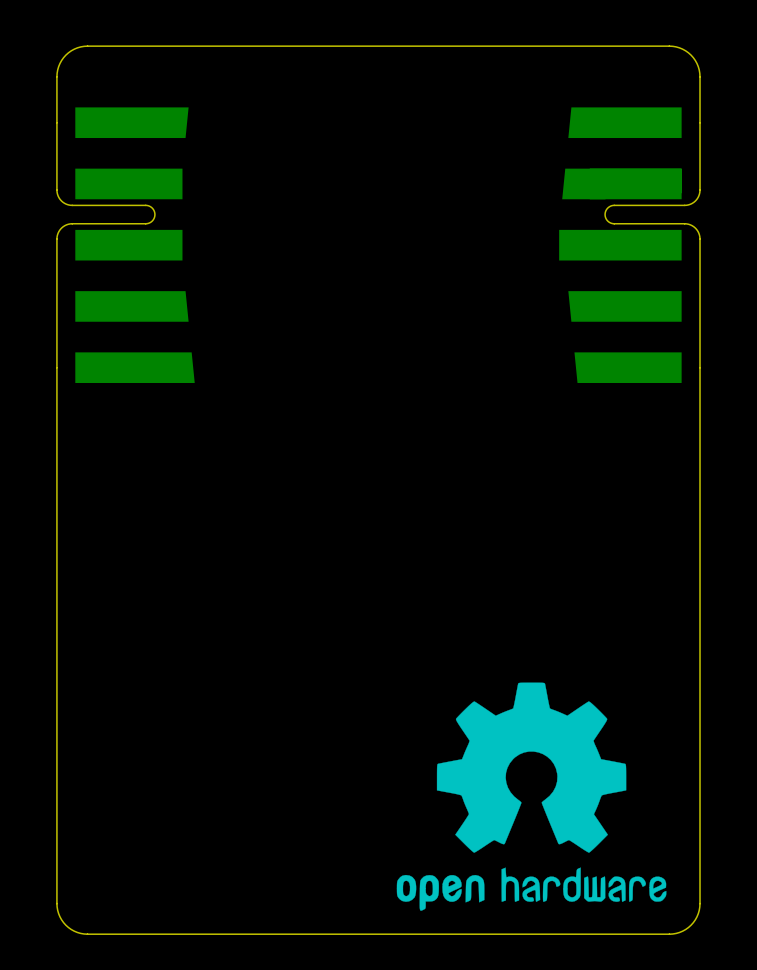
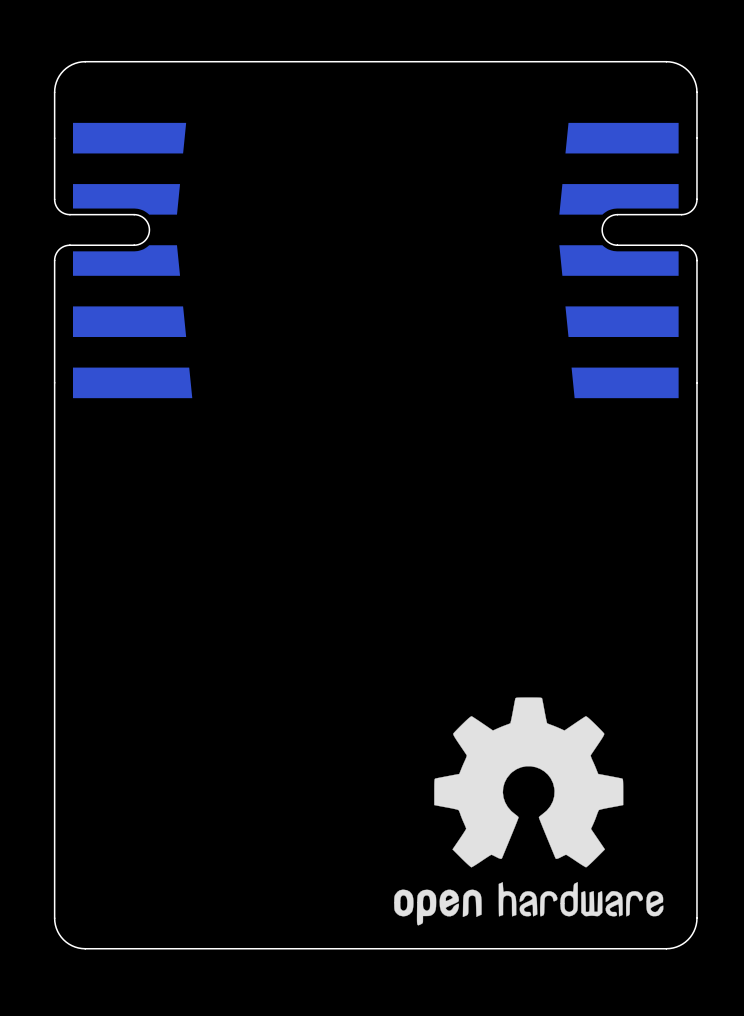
part footprint: [56, 107, 195, 383] -> [53, 122, 193, 399]
part footprint: [559, 107, 701, 383] -> [559, 122, 698, 399]

